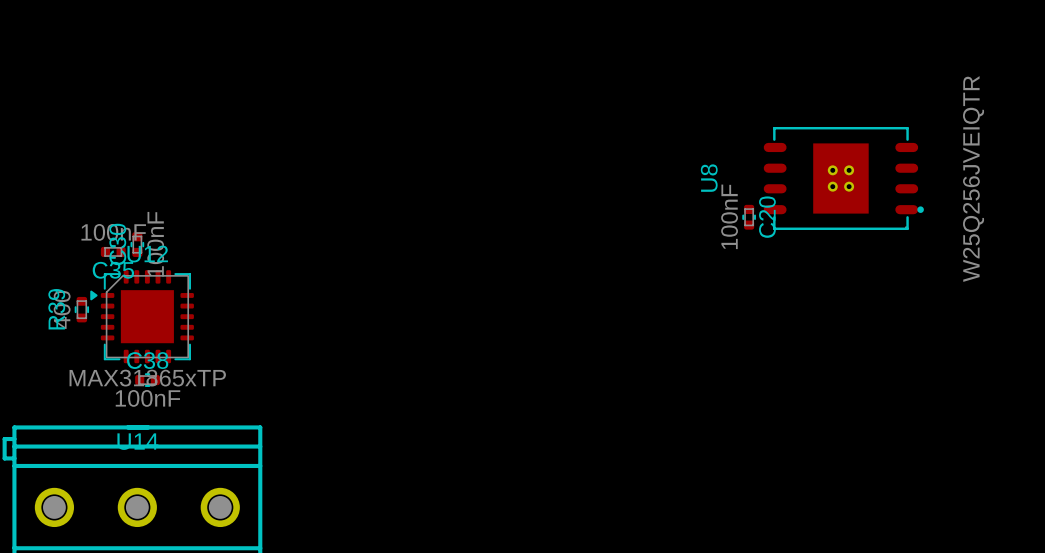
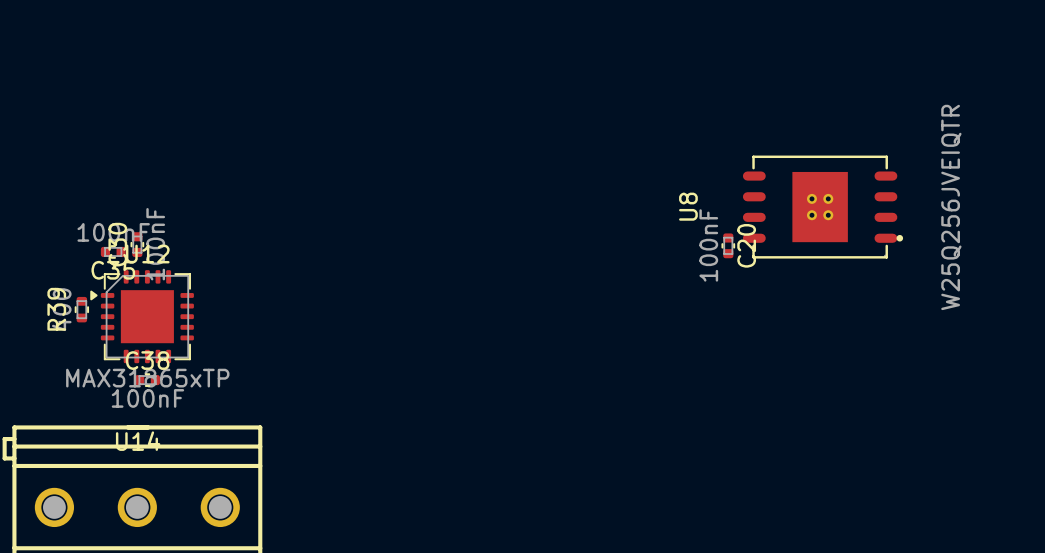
U8 position: (843, 178) -> (822, 207)
C20 position: (749, 217) -> (728, 245)

